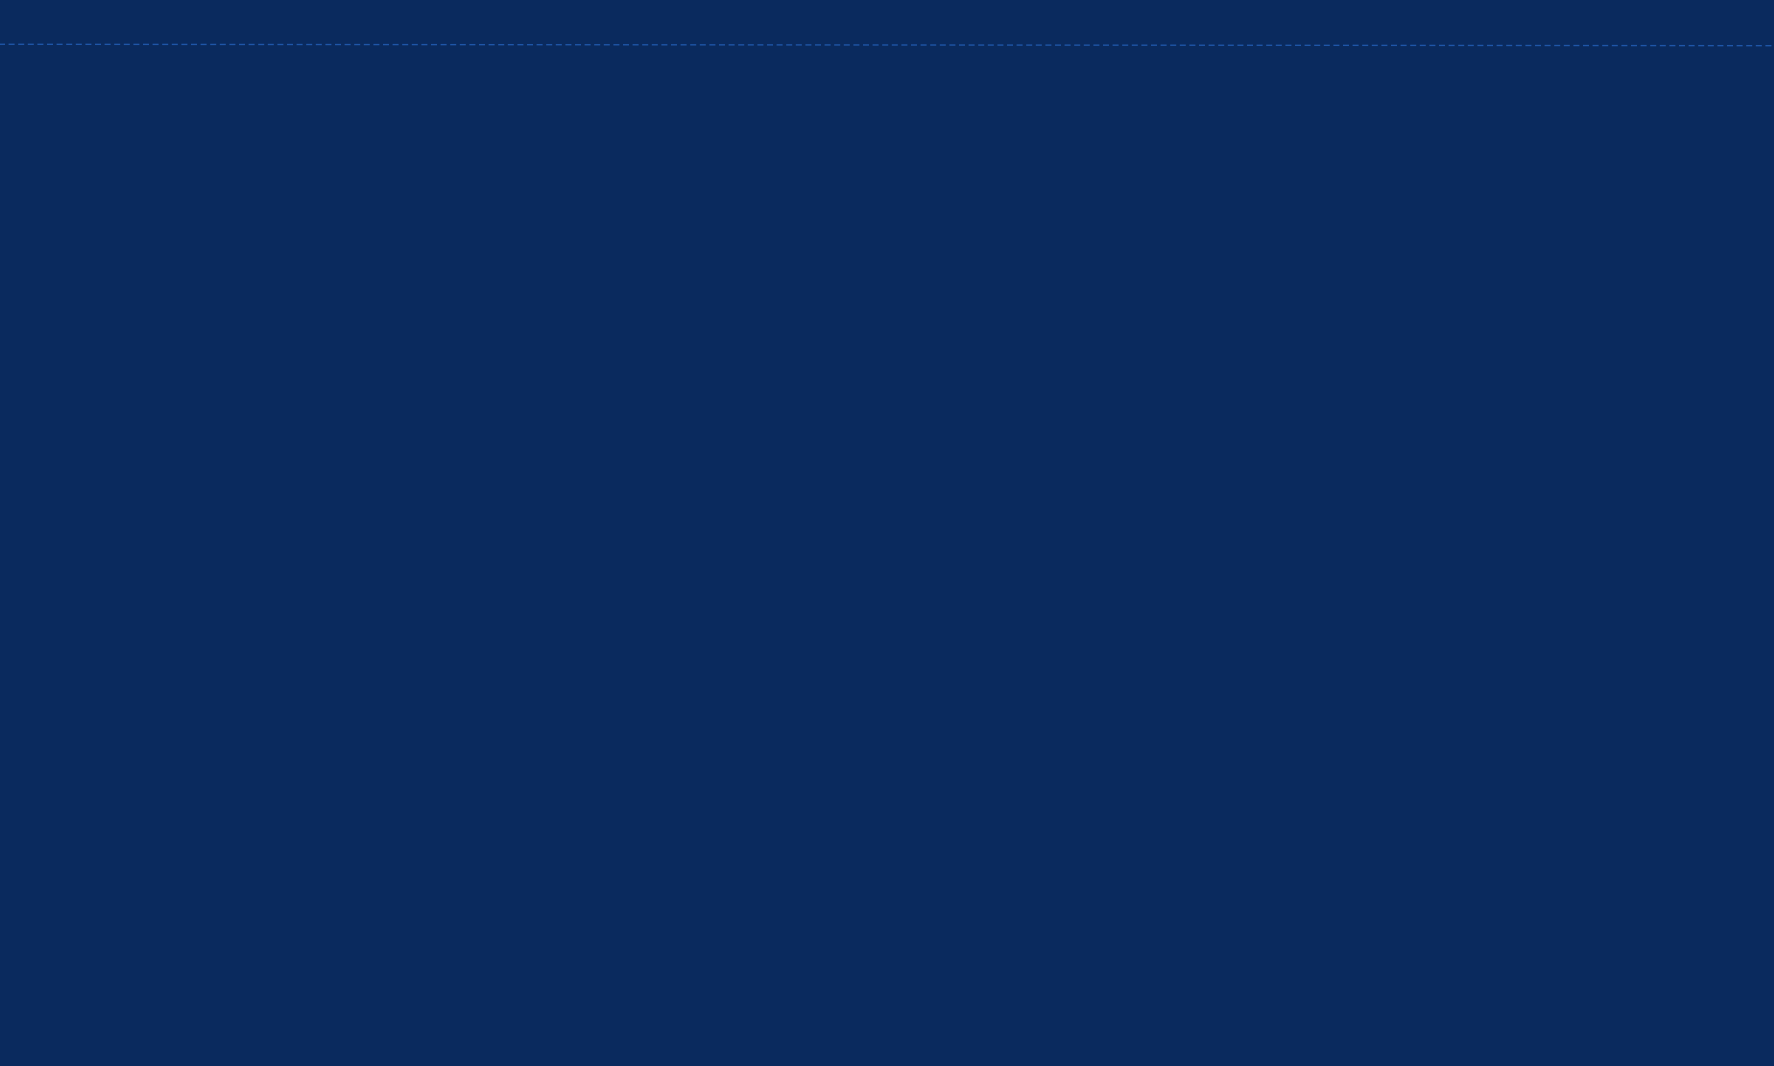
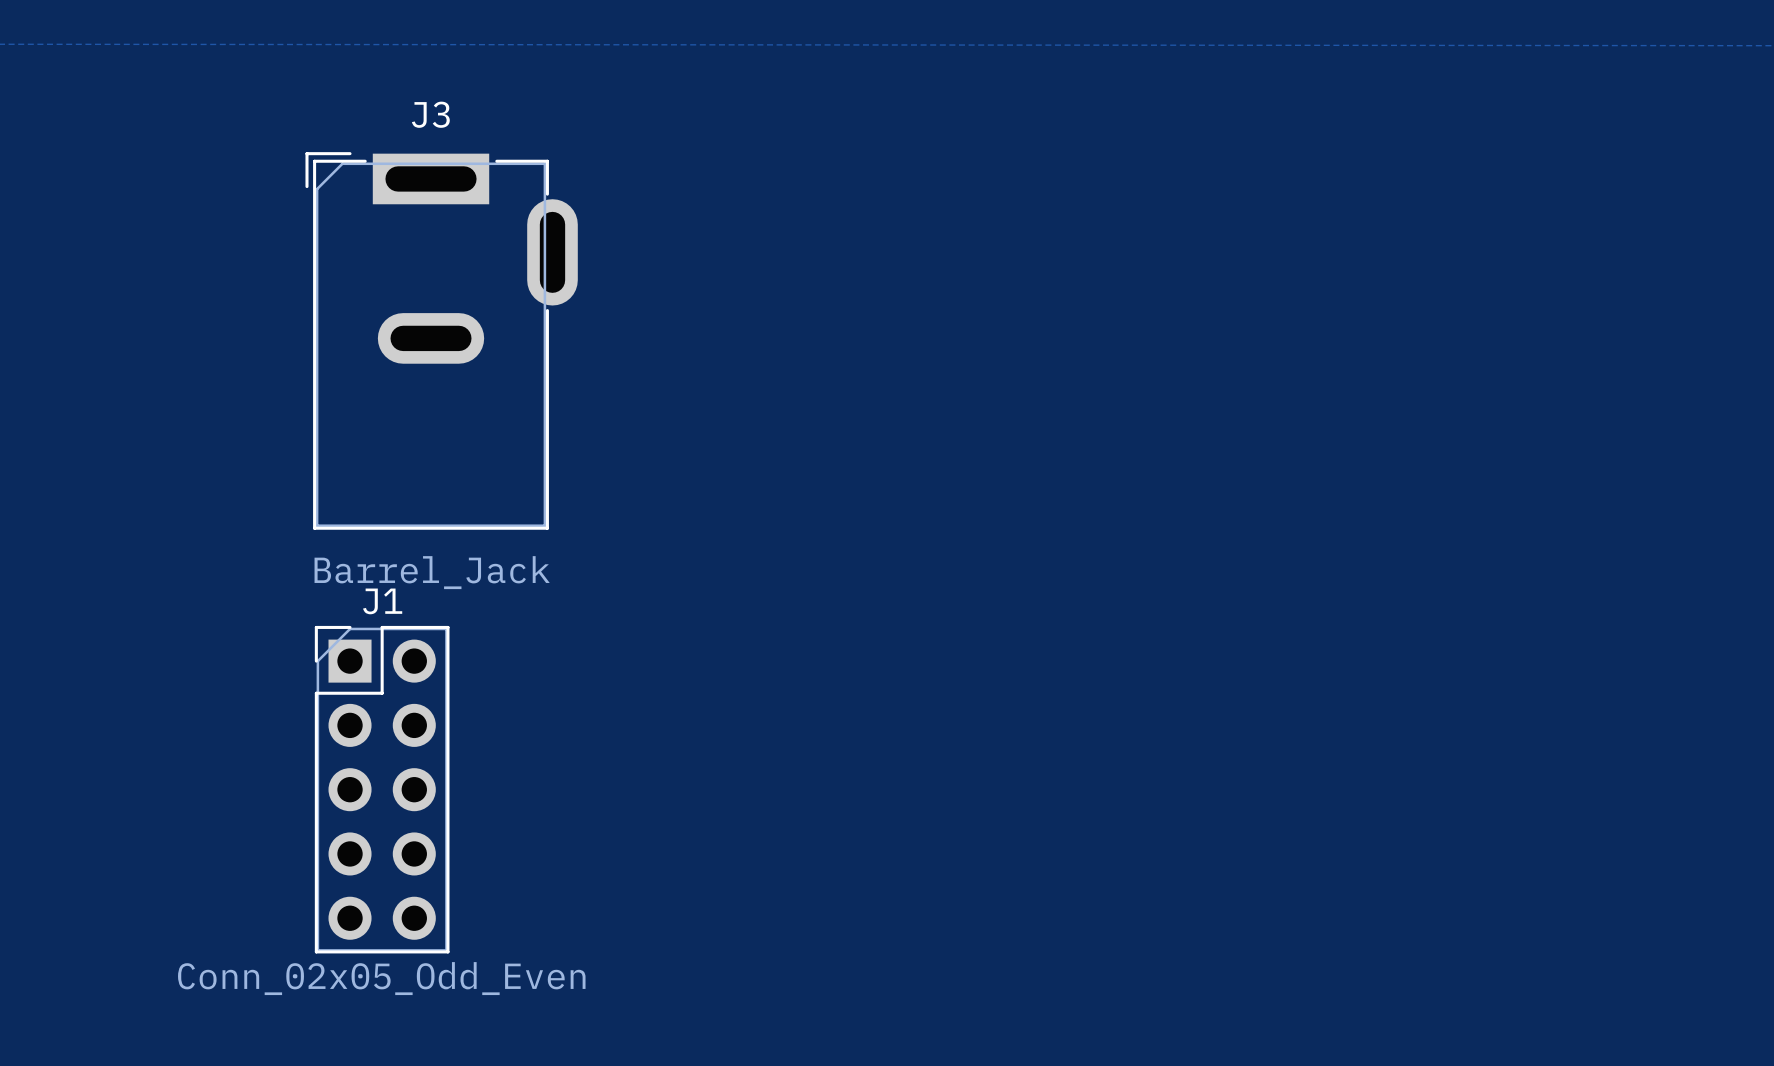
J3: none -> Barrel_Jack (441, 340)
J1: none -> Conn_02x05_Odd_Even (382, 789)

